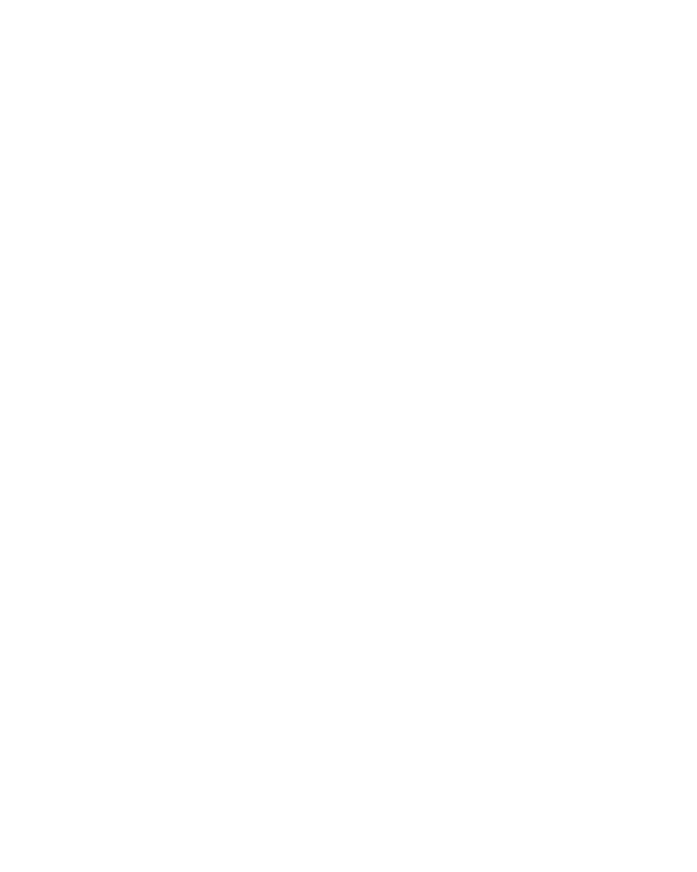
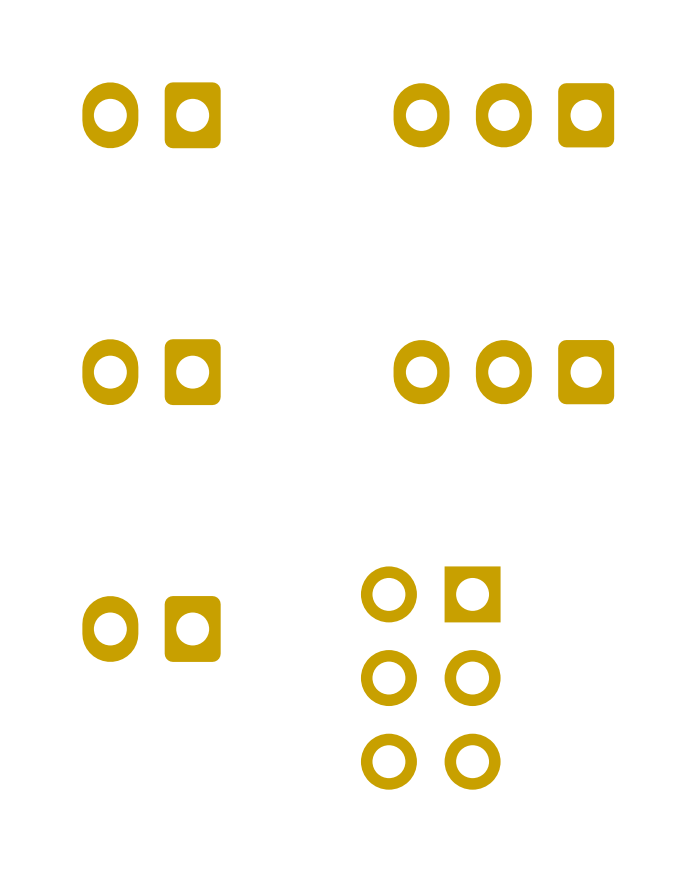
part: none -> (151, 115)
part: none -> (503, 115)
part: none -> (151, 372)
part: none -> (503, 372)
part: none -> (151, 628)
part: none -> (430, 678)

